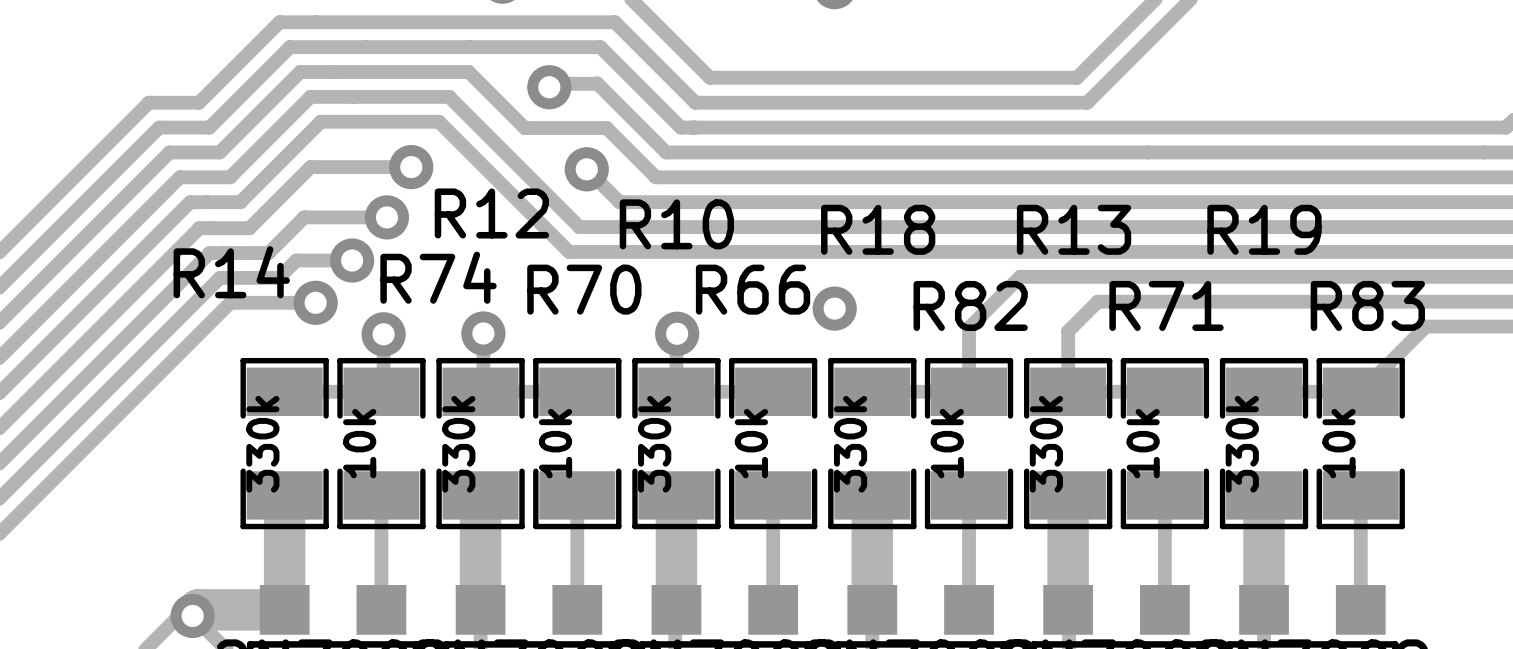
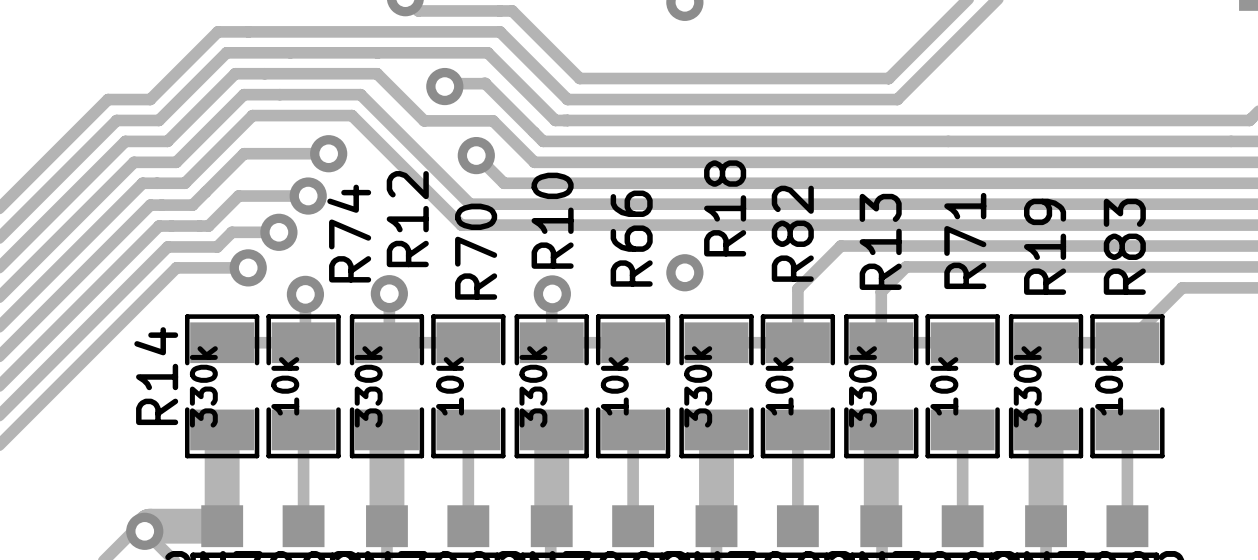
R12 name rotation: 0° (491, 213) -> 90° counterclockwise (407, 219)
R10 name rotation: 0° (676, 224) -> 90° counterclockwise (552, 220)
R18 name rotation: 0° (878, 229) -> 90° counterclockwise (725, 208)
R13 name rotation: 0° (1074, 229) -> 90° counterclockwise (880, 241)
R19 name rotation: 0° (1264, 229) -> 90° counterclockwise (1045, 246)
R14 name rotation: 0° (231, 272) -> 90° counterclockwise (156, 376)
R14 name position: R14 (231, 272) -> R14 (156, 376)
R74 name rotation: 0° (438, 277) -> 90° counterclockwise (349, 233)
R70 name rotation: 0° (584, 289) -> 90° counterclockwise (476, 251)
R66 name rotation: 0° (753, 289) -> 90° counterclockwise (631, 238)
R82 name rotation: 0° (970, 305) -> 90° counterclockwise (792, 233)
R71 name rotation: 0° (1166, 305) -> 90° counterclockwise (965, 240)
R83 name rotation: 0° (1367, 305) -> 90° counterclockwise (1124, 246)

